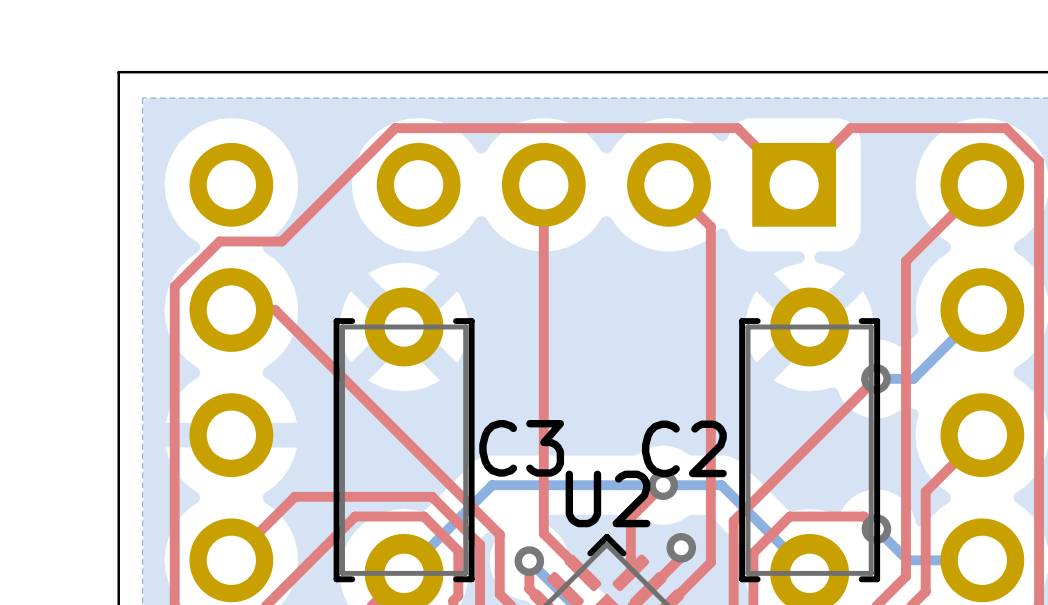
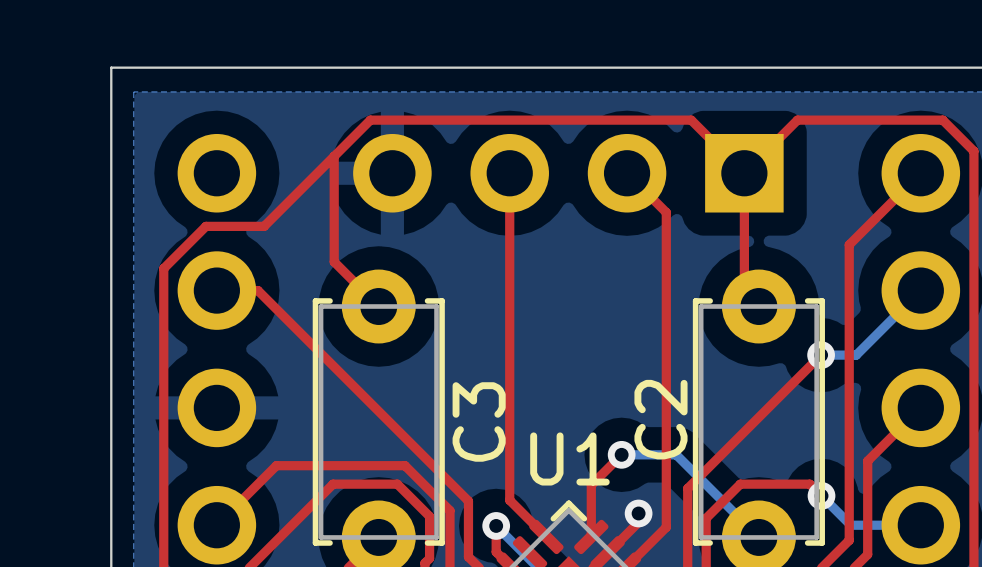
top track: none -> (334, 156) (334, 261) (378, 306)
top track: none -> (744, 173) (744, 291)
C3 name rotation: 0° (521, 448) -> 90° counterclockwise (479, 421)
C2 name rotation: 0° (684, 448) -> 90° counterclockwise (660, 419)
bottom track: (663, 485) (492, 485) (404, 573) -> none
U2 name: U2 (608, 498) -> U1 (569, 458)

